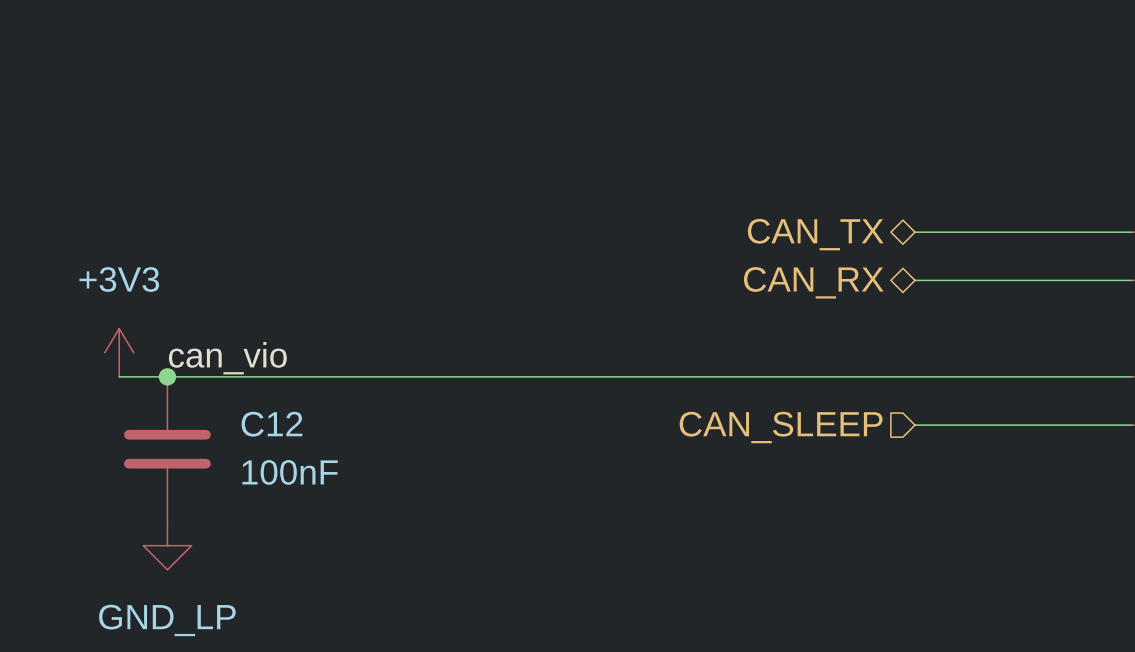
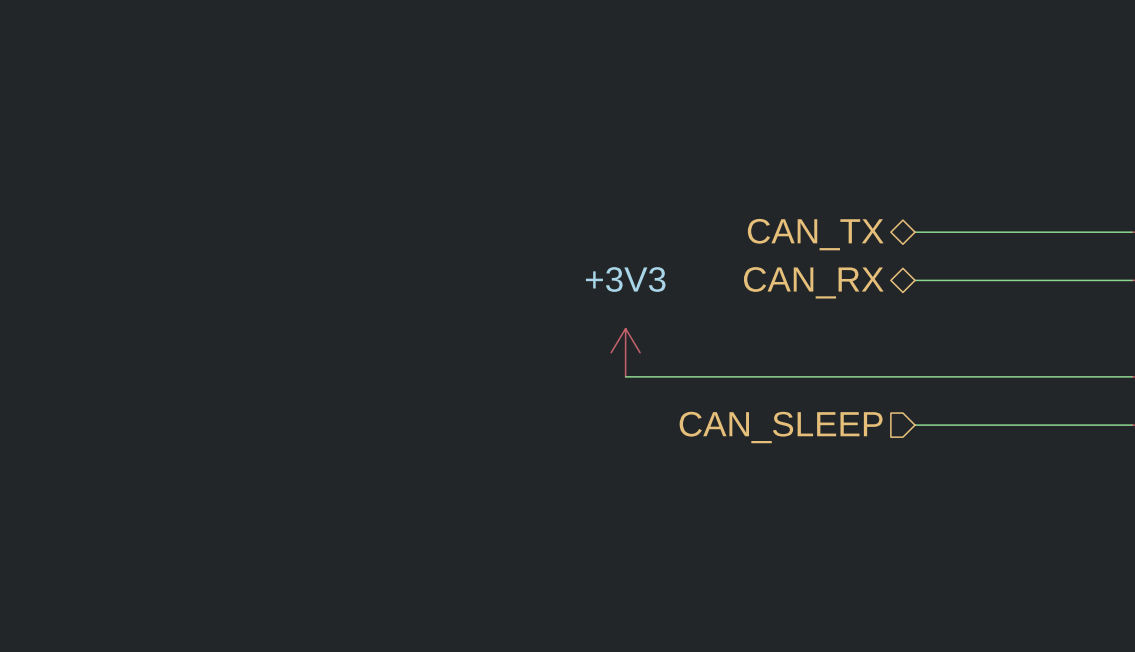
power symbol: +3V3 (119, 352) -> none
power symbol: none -> +3V3 (625, 352)
label: can_vio (227, 358) -> none
wire: (119, 376) (625, 376) -> none
junction: (167, 376) -> none
C12: 100nF (167, 449) -> none
power symbol: GND_LP (167, 545) -> none

